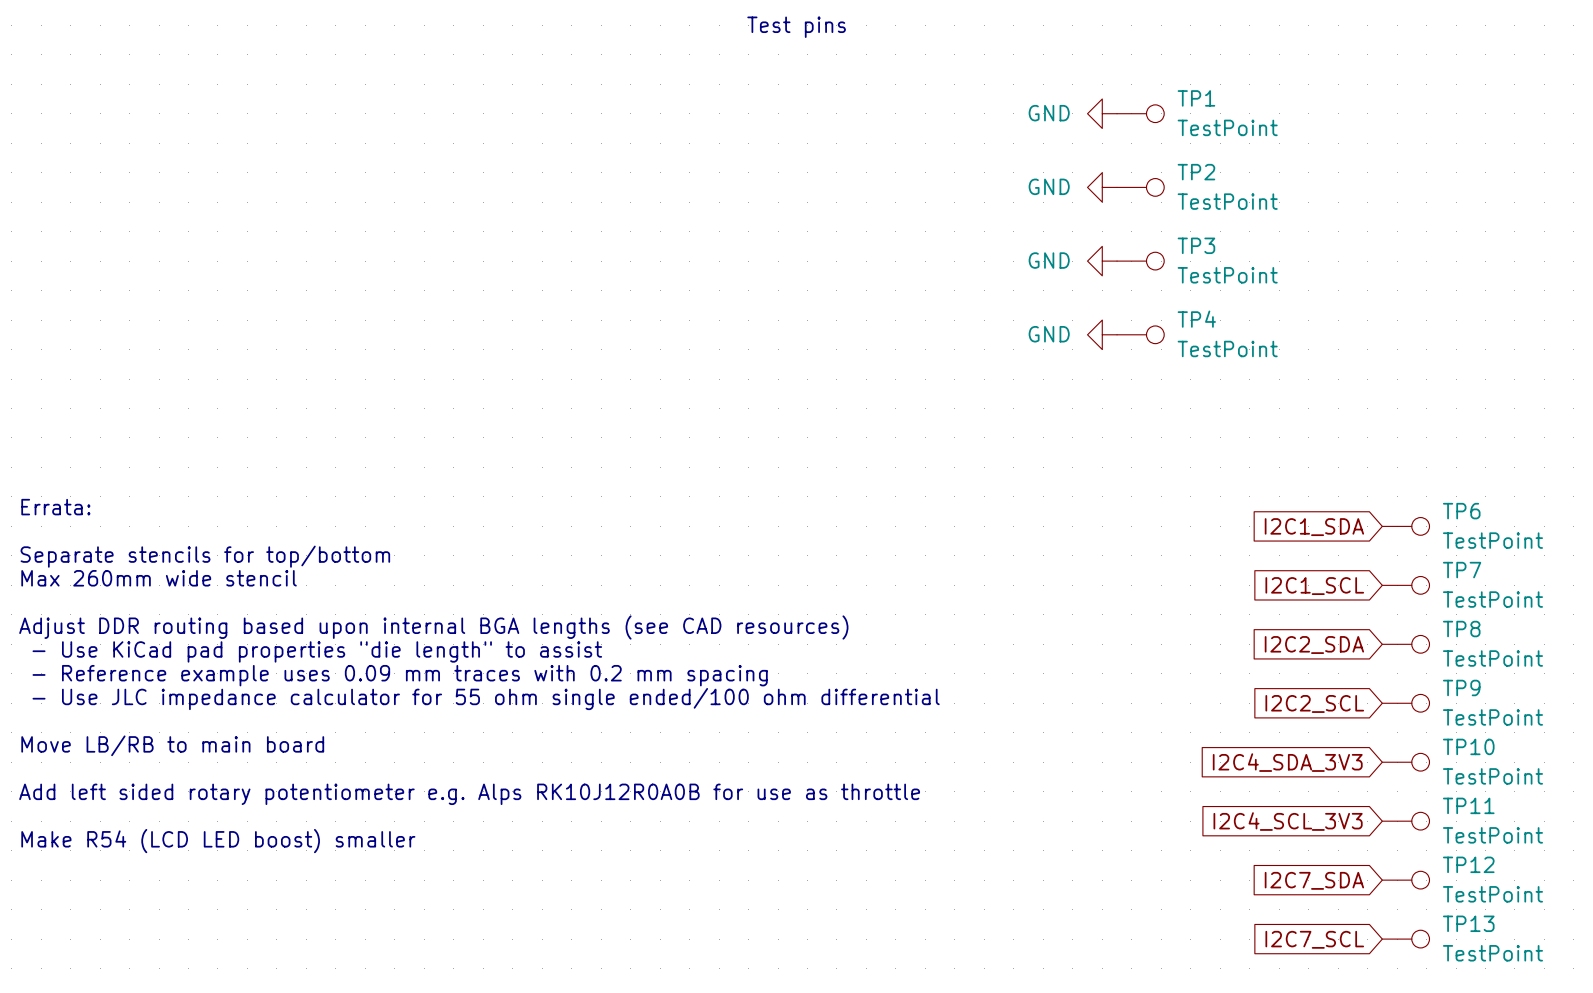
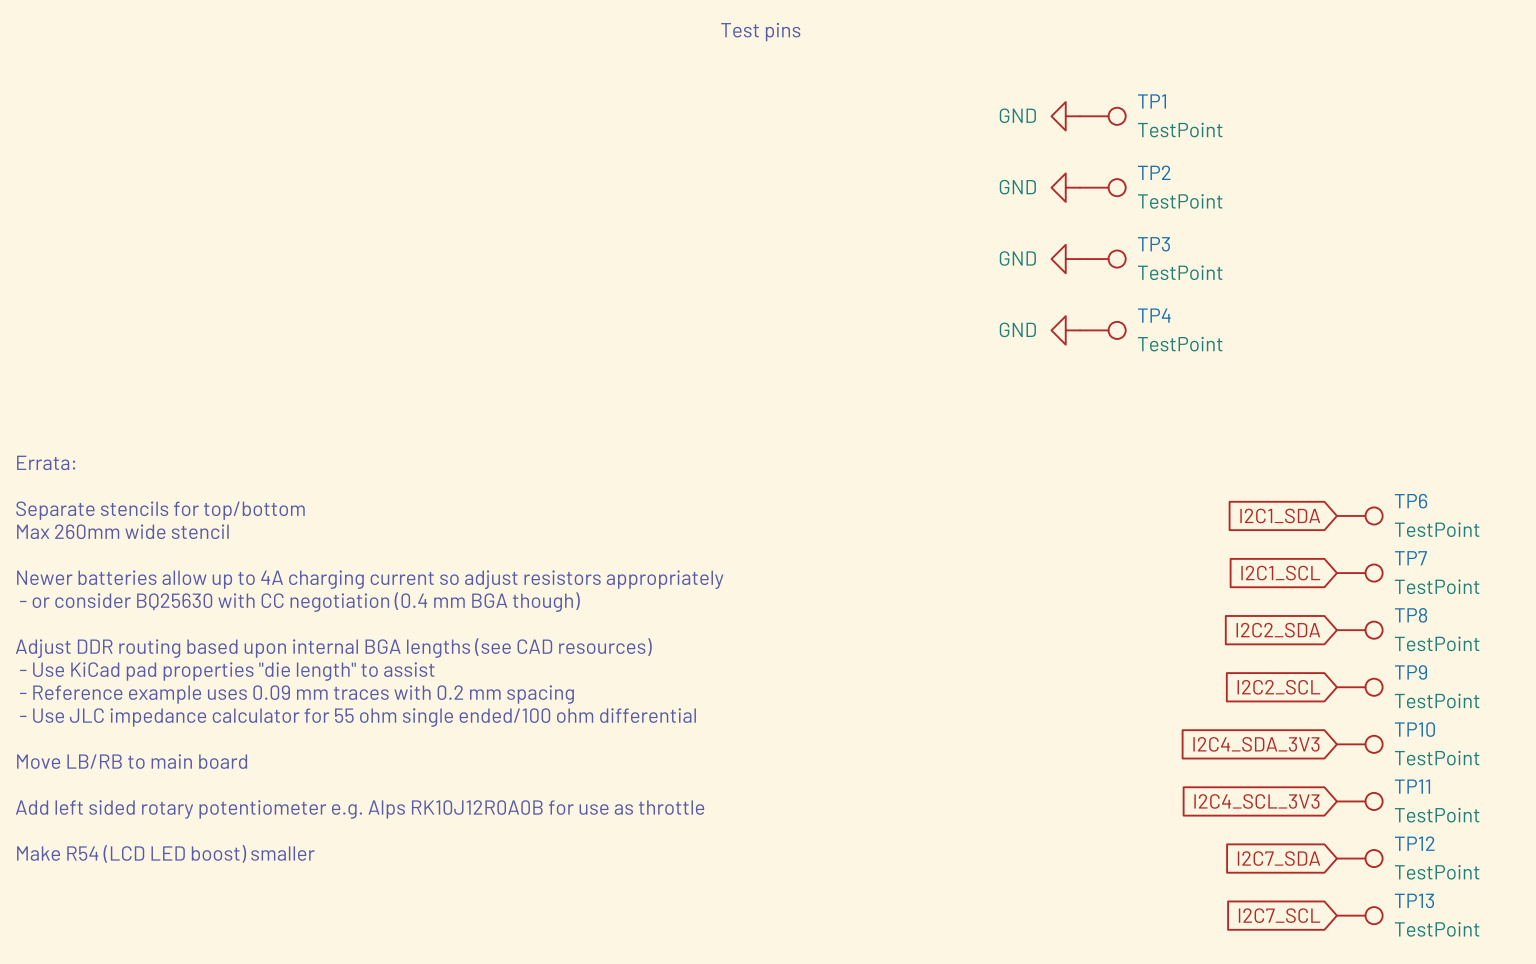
text position: Errata: (55, 507) -> Errata: (46, 462)
text position: Separate stencils for top/bottom (205, 556) -> Separate stencils for top/bottom (160, 510)
text position: Max 260mm wide stencil (159, 578) -> Max 260mm wide stencil (122, 531)
text: none -> Newer batteries allow up to 4A charging current so adjust resistors appropriately (370, 579)
text: none -> - or consider BQ25630 with CC negotiation (0.4 mm BGA though) (299, 602)
text position: Adjust DDR routing based upon internal BGA lengths (see CAD resources) (433, 627) -> Adjust DDR routing based upon internal BGA lengths (see CAD resources) (333, 648)
text position: - Use KiCad pad properties "die length" to assist (317, 651) -> - Use KiCad pad properties "die length" to assist (227, 671)
text position: - Reference example uses 0.09 mm traces with 0.2 mm spacing (400, 675) -> - Reference example uses 0.09 mm traces with 0.2 mm spacing (296, 694)
text position: - Use JLC impedance calculator for 55 ohm single ended/100 ohm differential (486, 699) -> - Use JLC impedance calculator for 55 ohm single ended/100 ohm differential (357, 717)
text position: Move LB/RB to main board (172, 745) -> Move LB/RB to main board (132, 761)
text position: Add left sided rotary potentiometer e.g. Alps RK10J12R0A0B for use as throttle (469, 794) -> Add left sided rotary potentiometer e.g. Alps RK10J12R0A0B for use as throttle (360, 809)
text position: Make R54 (LCD LED boost) smaller (218, 841) -> Make R54 (LCD LED boost) smaller (165, 853)

